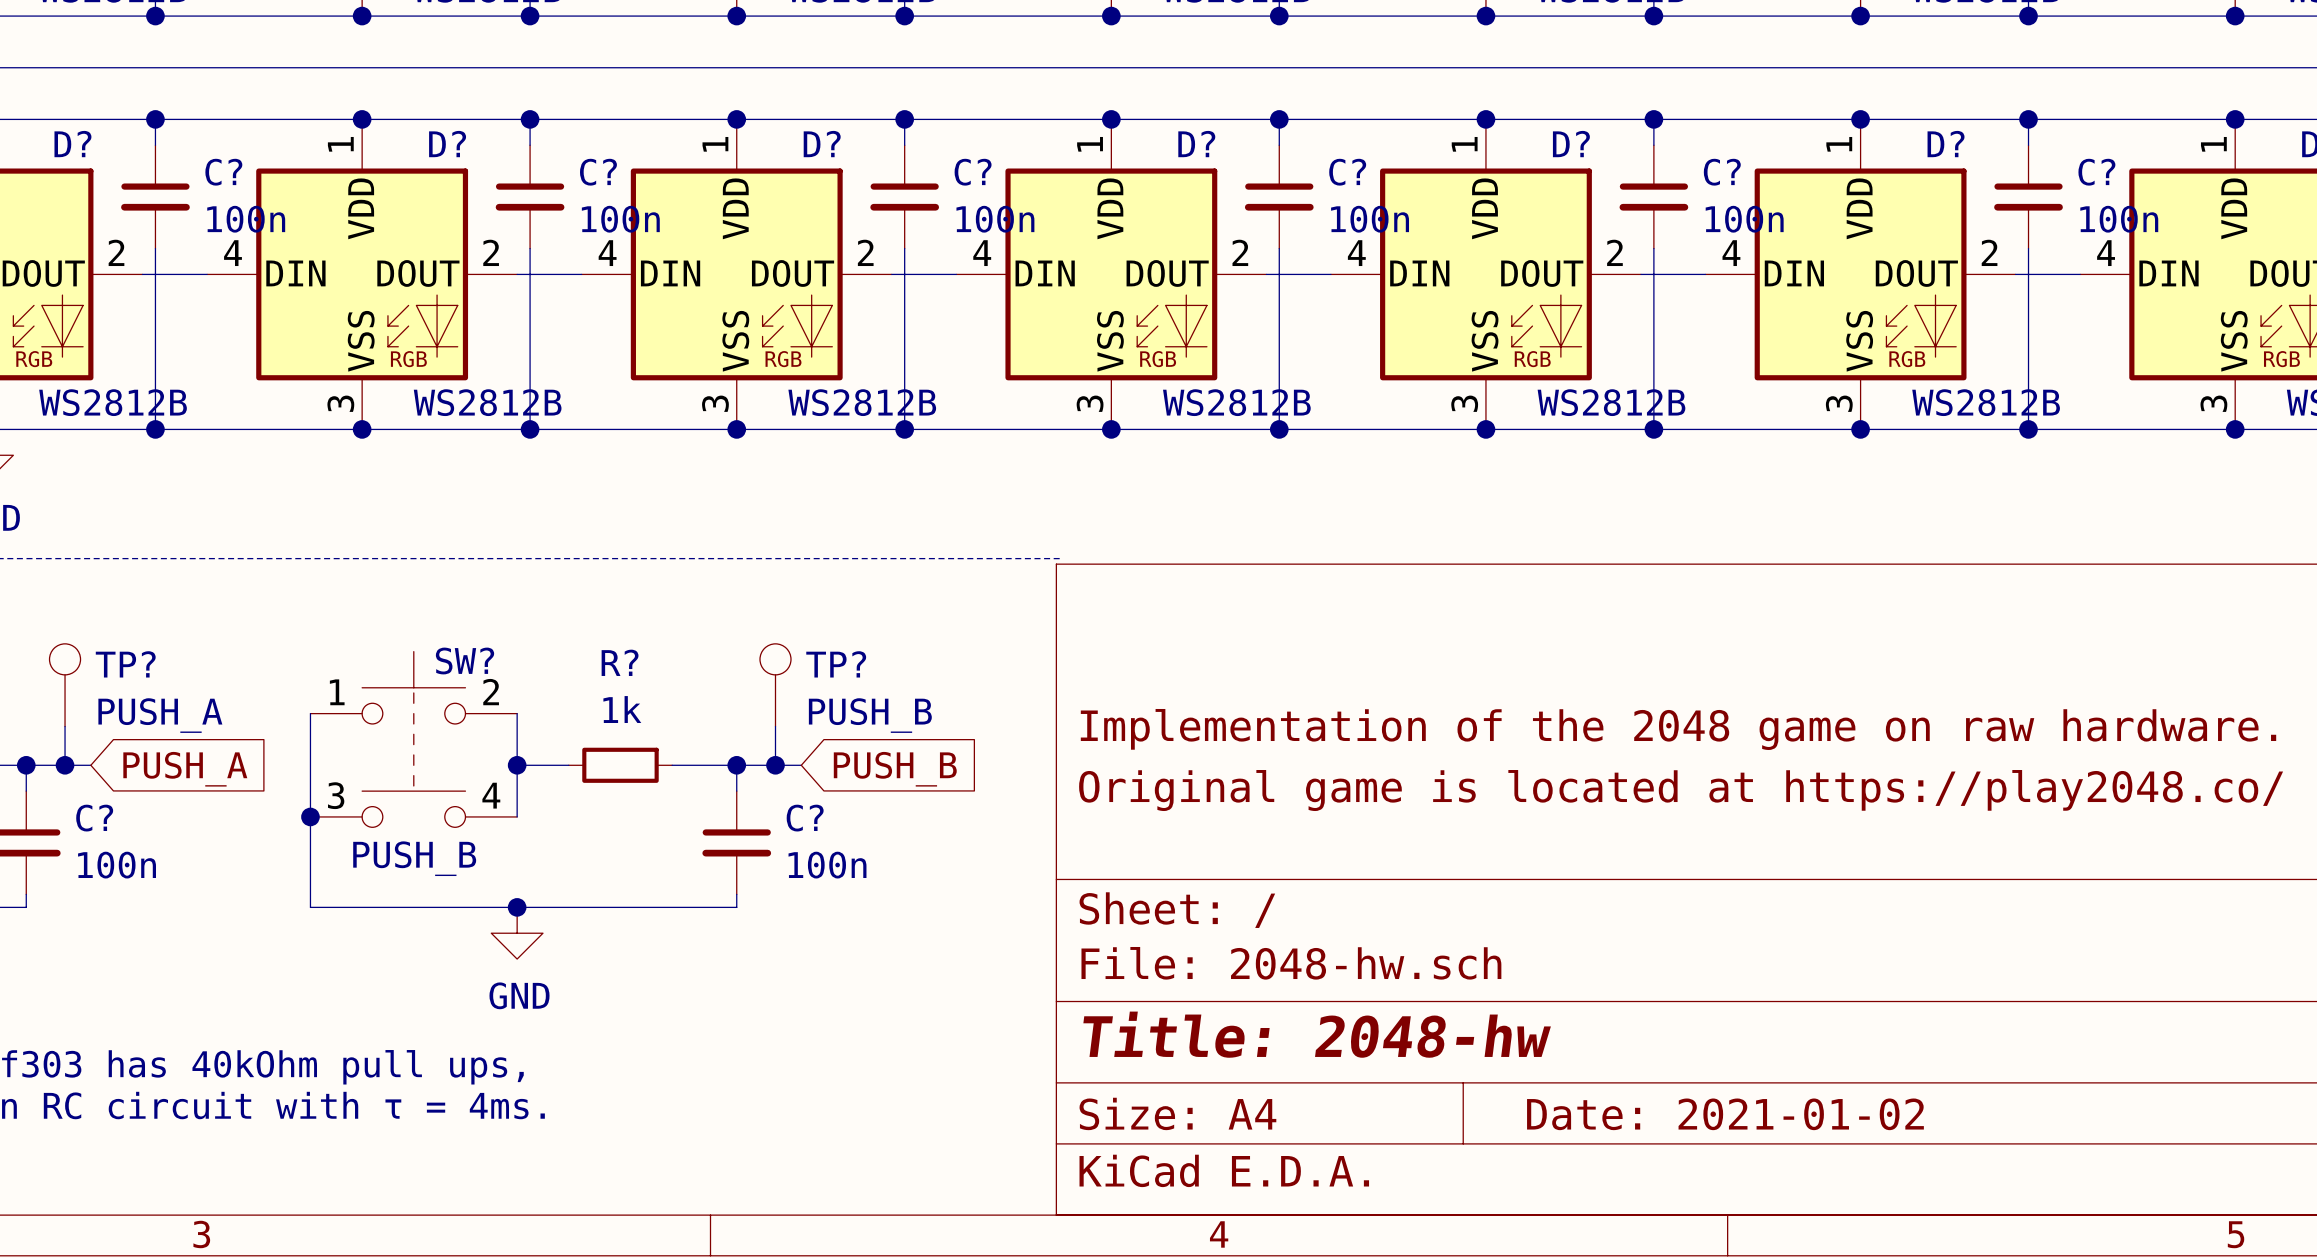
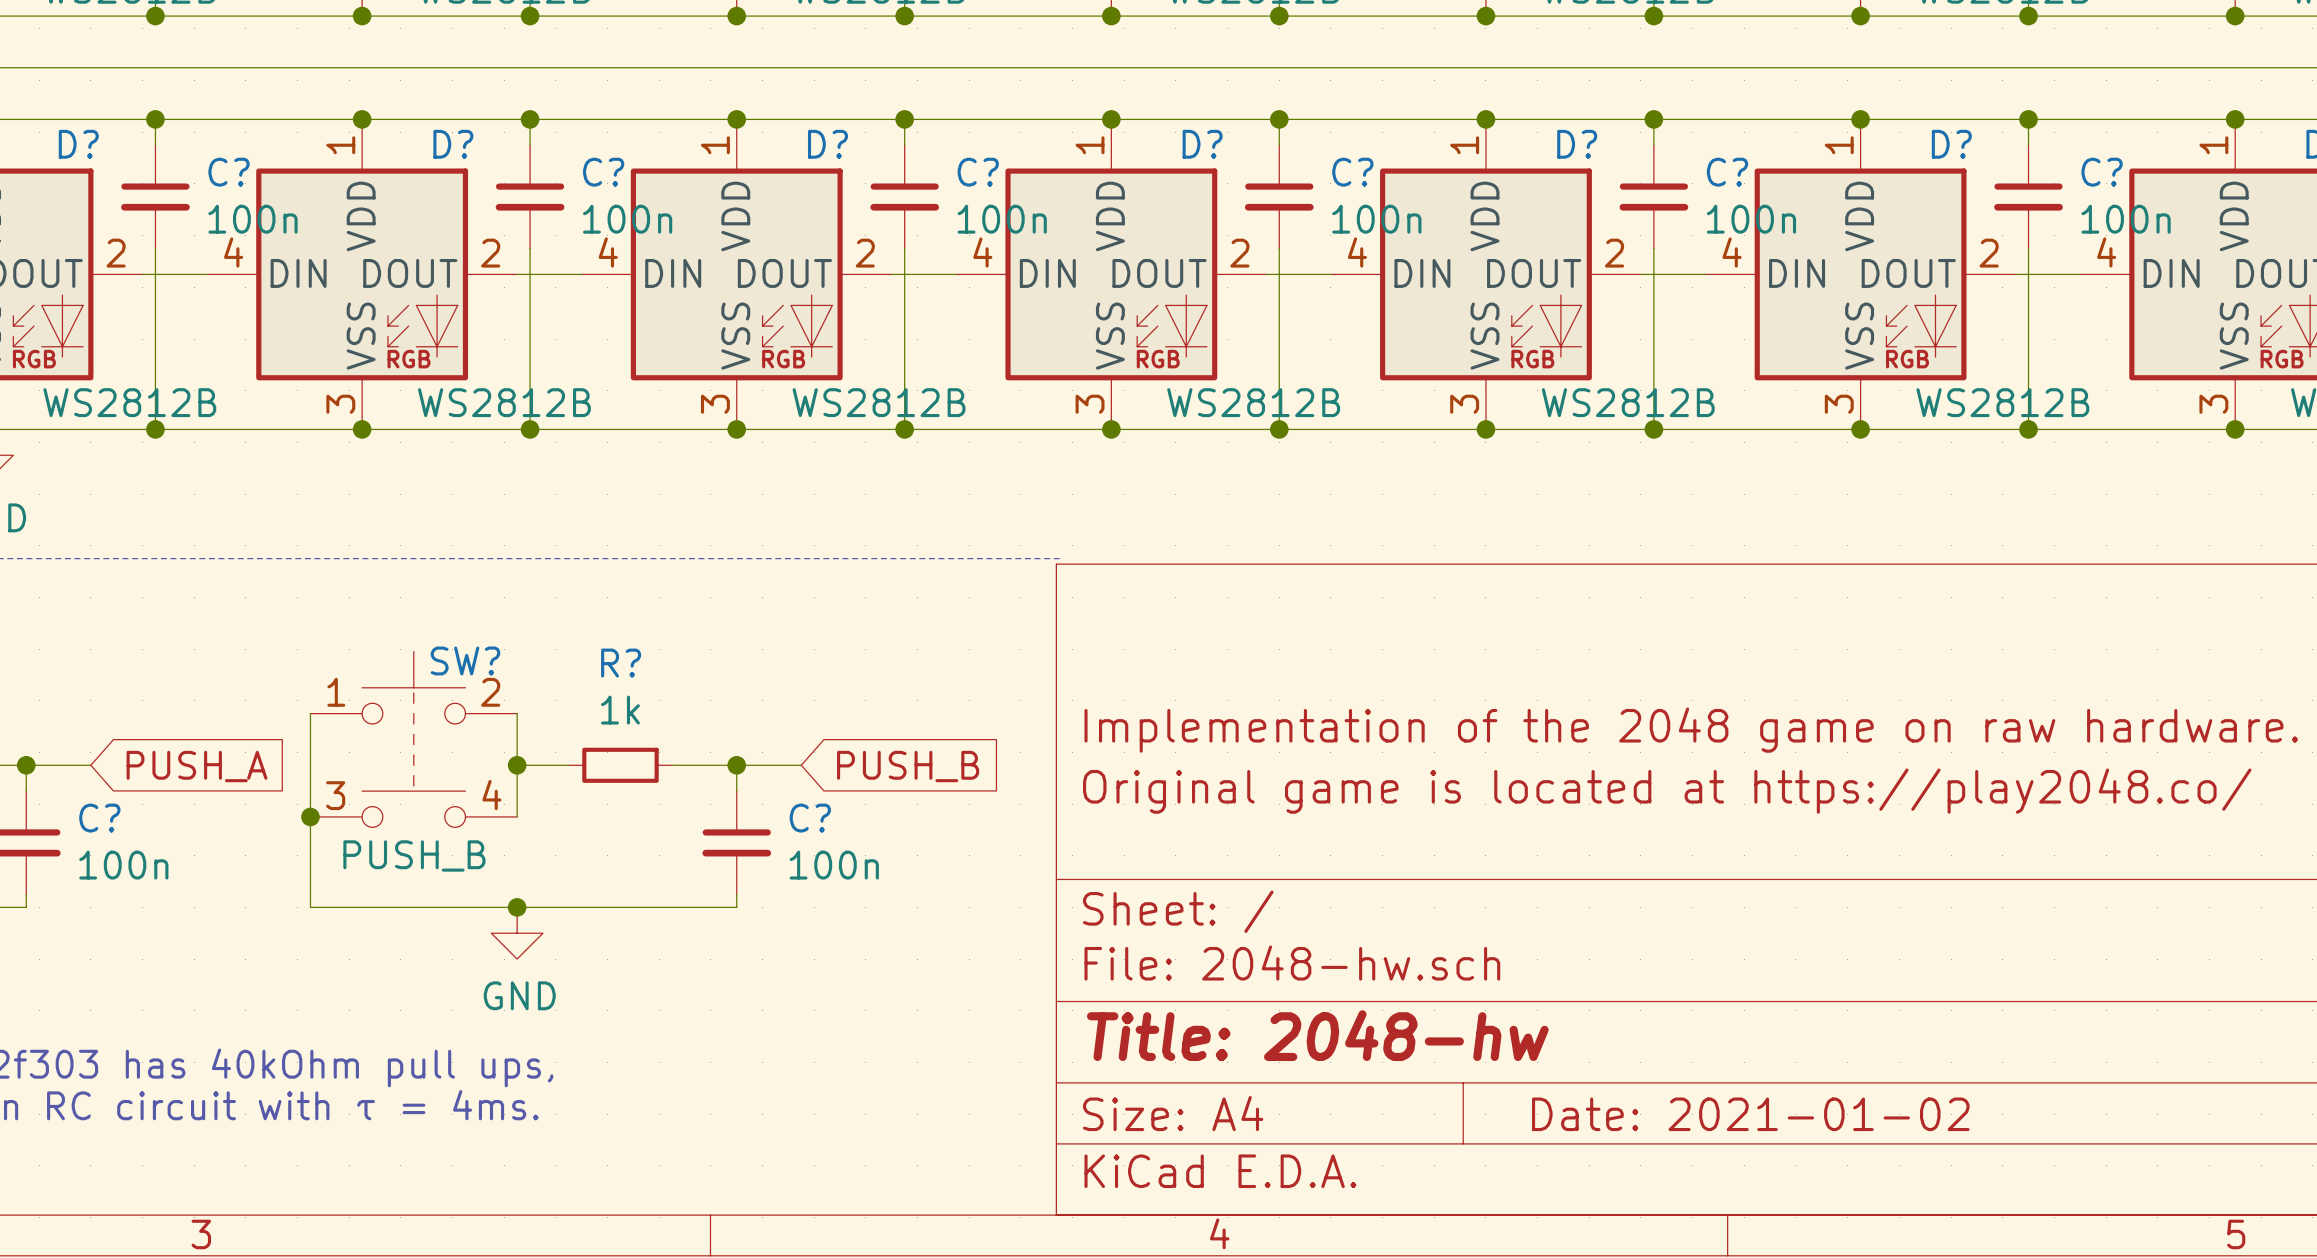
TP?: PUSH_A (65, 685) -> none
TP?: PUSH_B (775, 685) -> none
wire: (65, 726) (65, 765) -> none
wire: (775, 726) (775, 765) -> none
junction: (65, 765) -> none
junction: (775, 765) -> none

